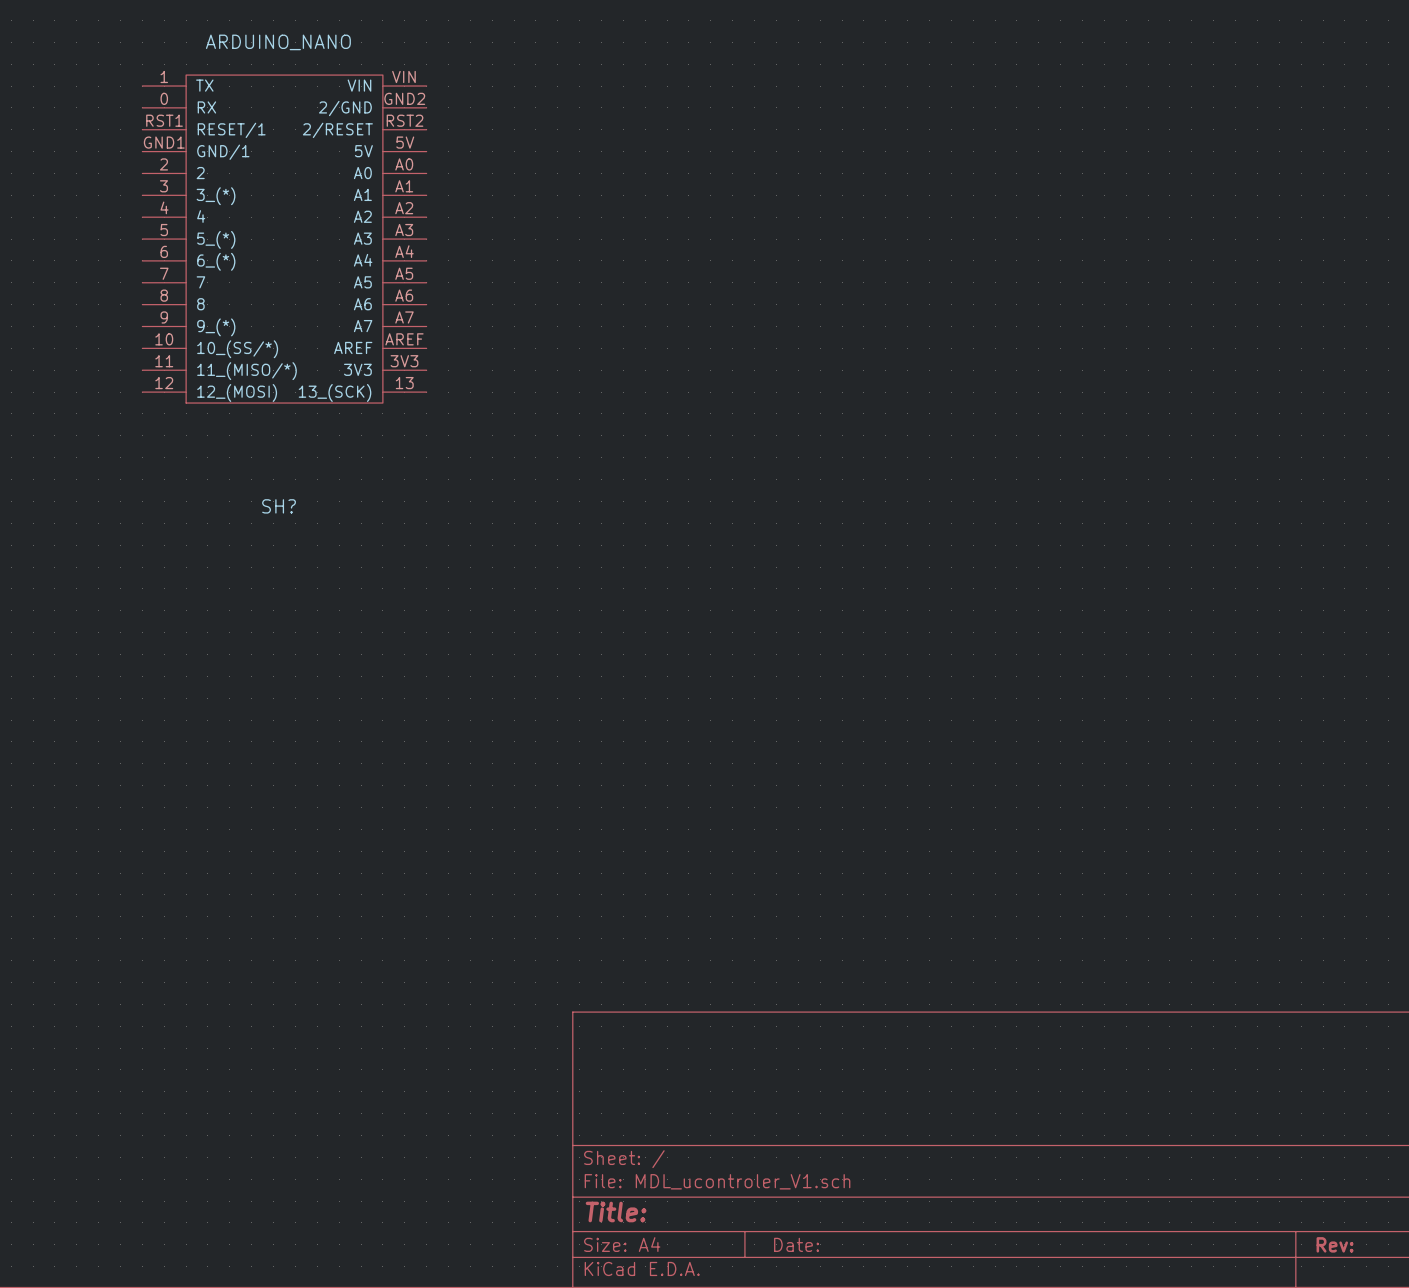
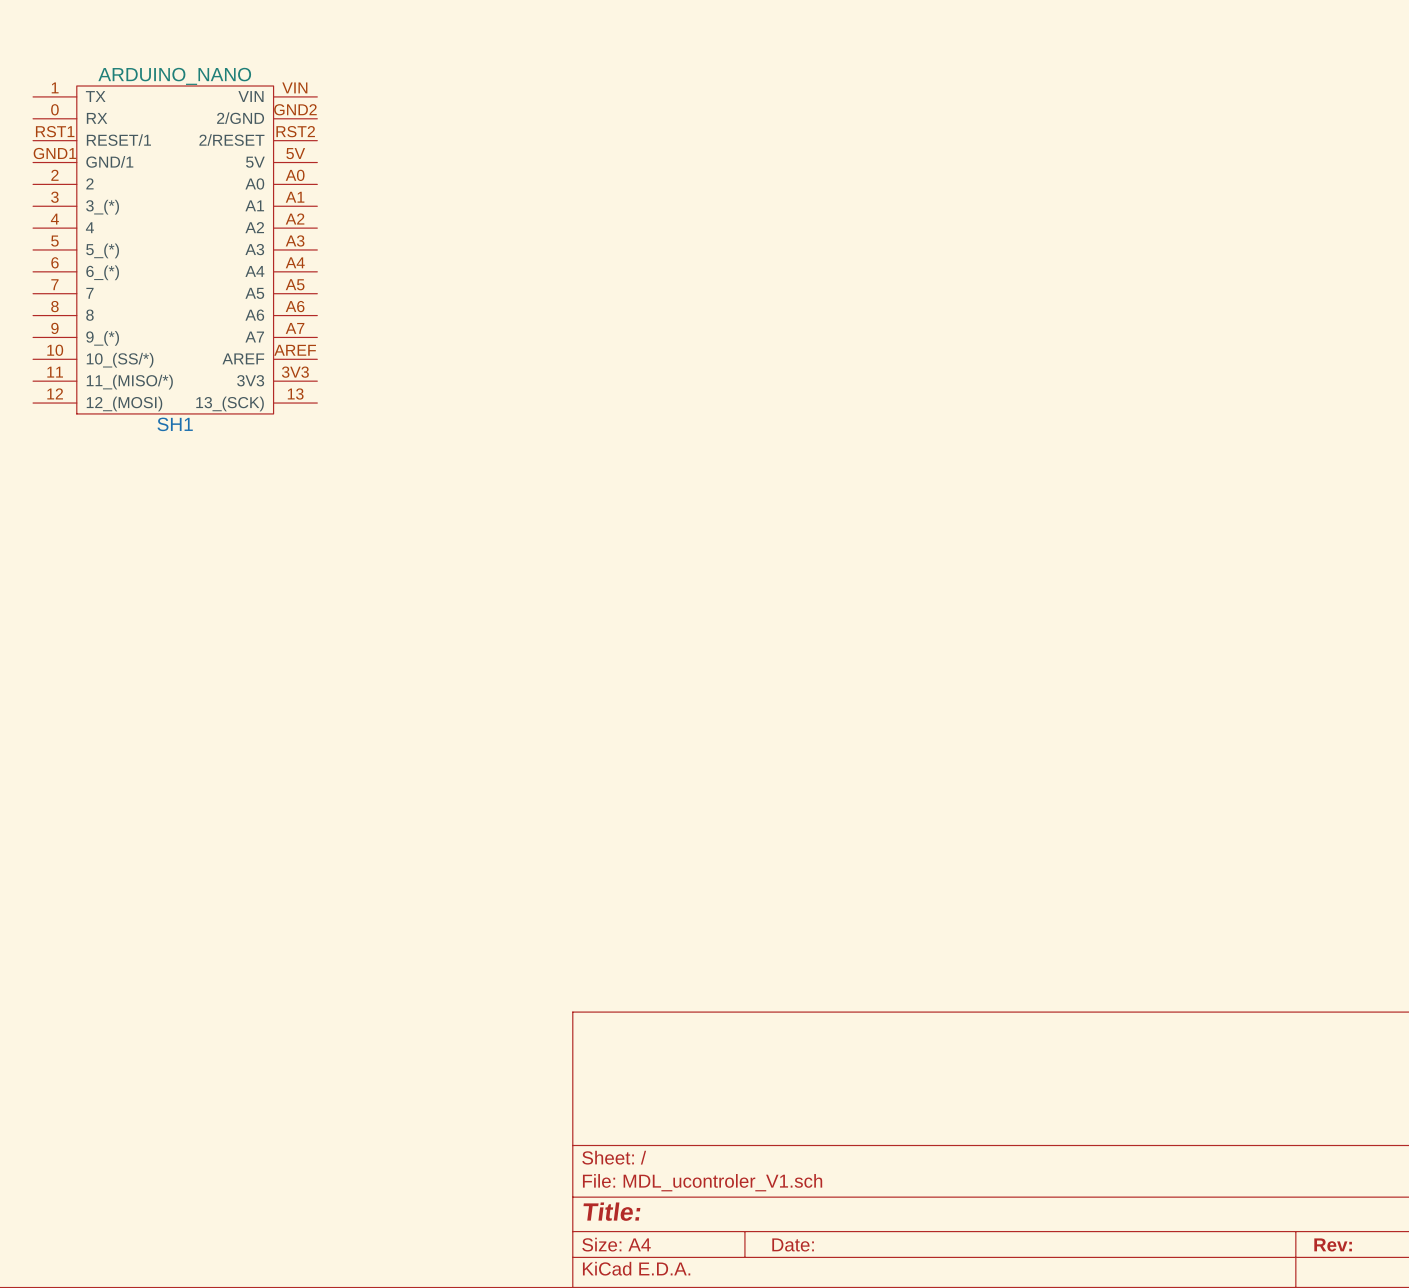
SH?: ARDUINO_NANO (284, 239) -> none
SH1: none -> ARDUINO_NANO (175, 249)

